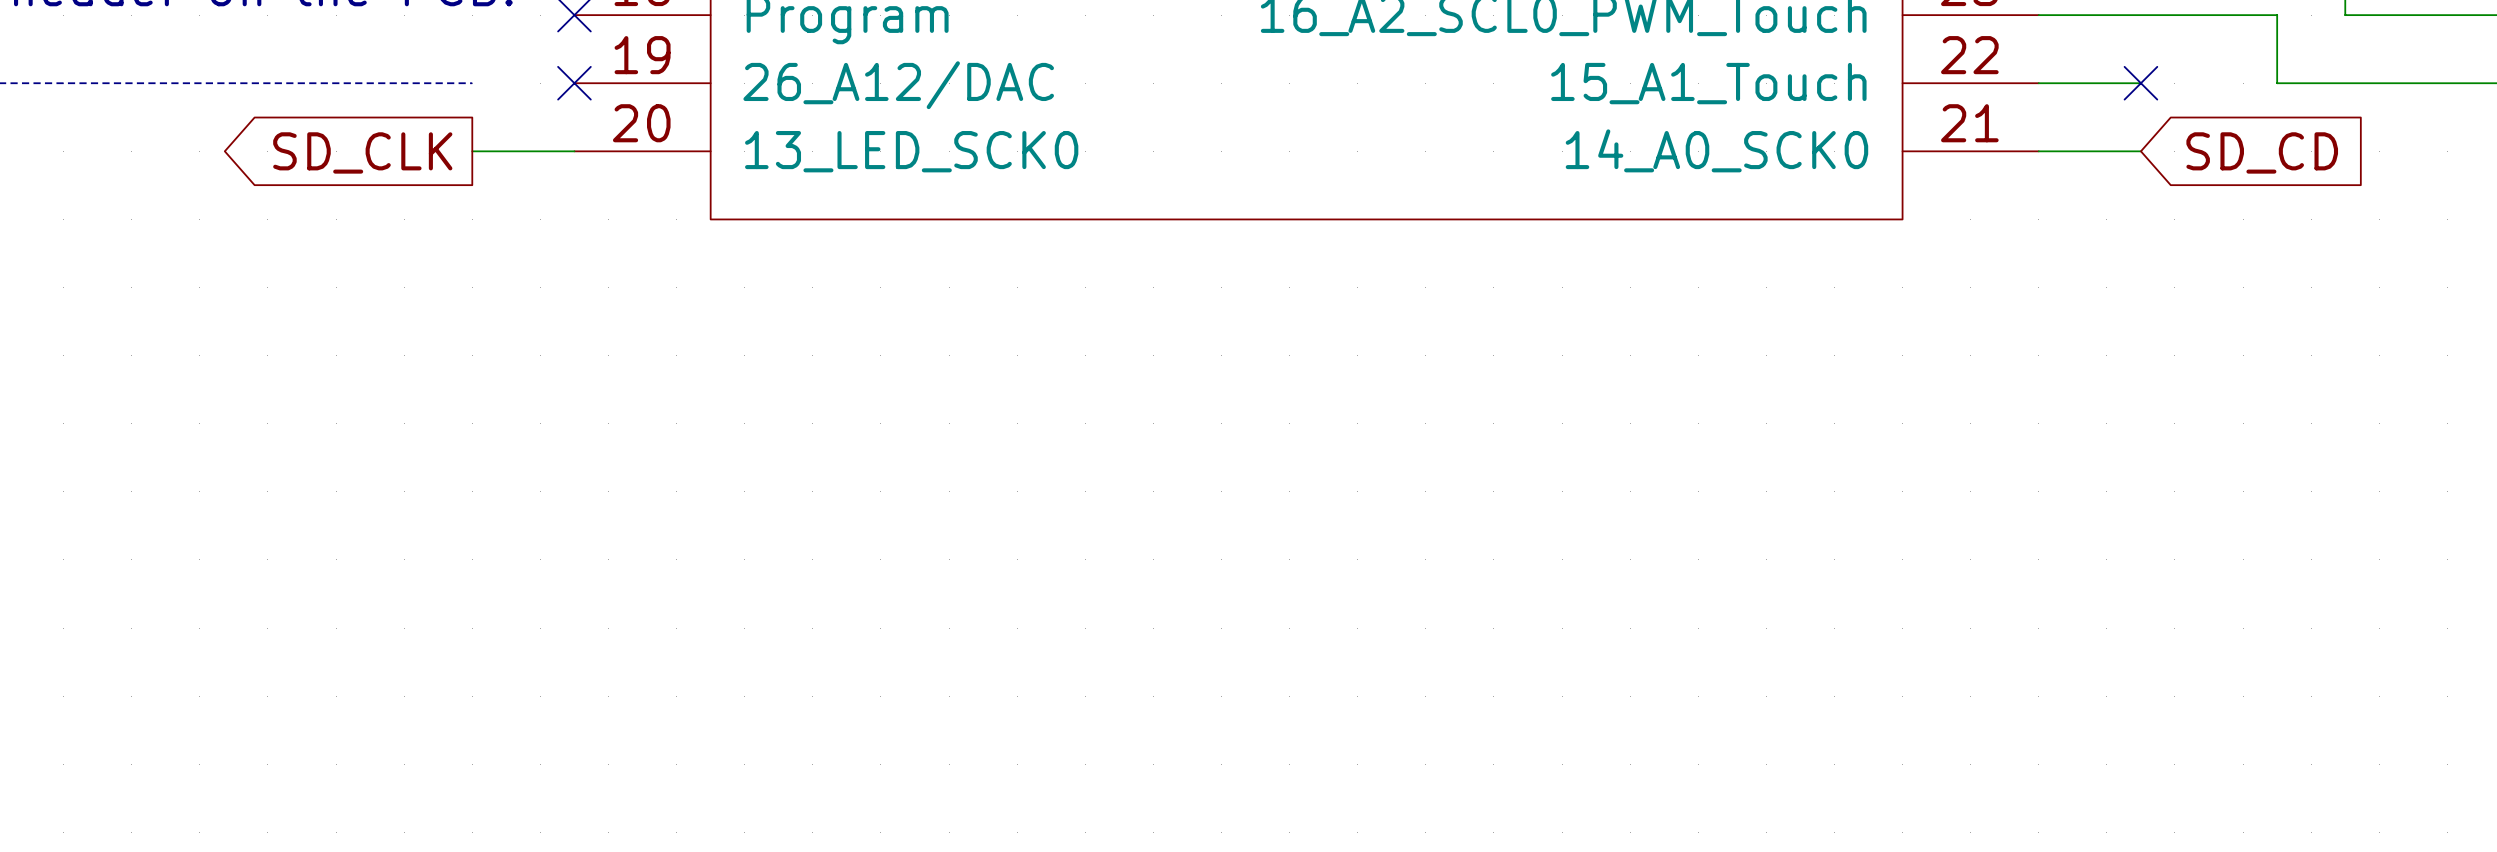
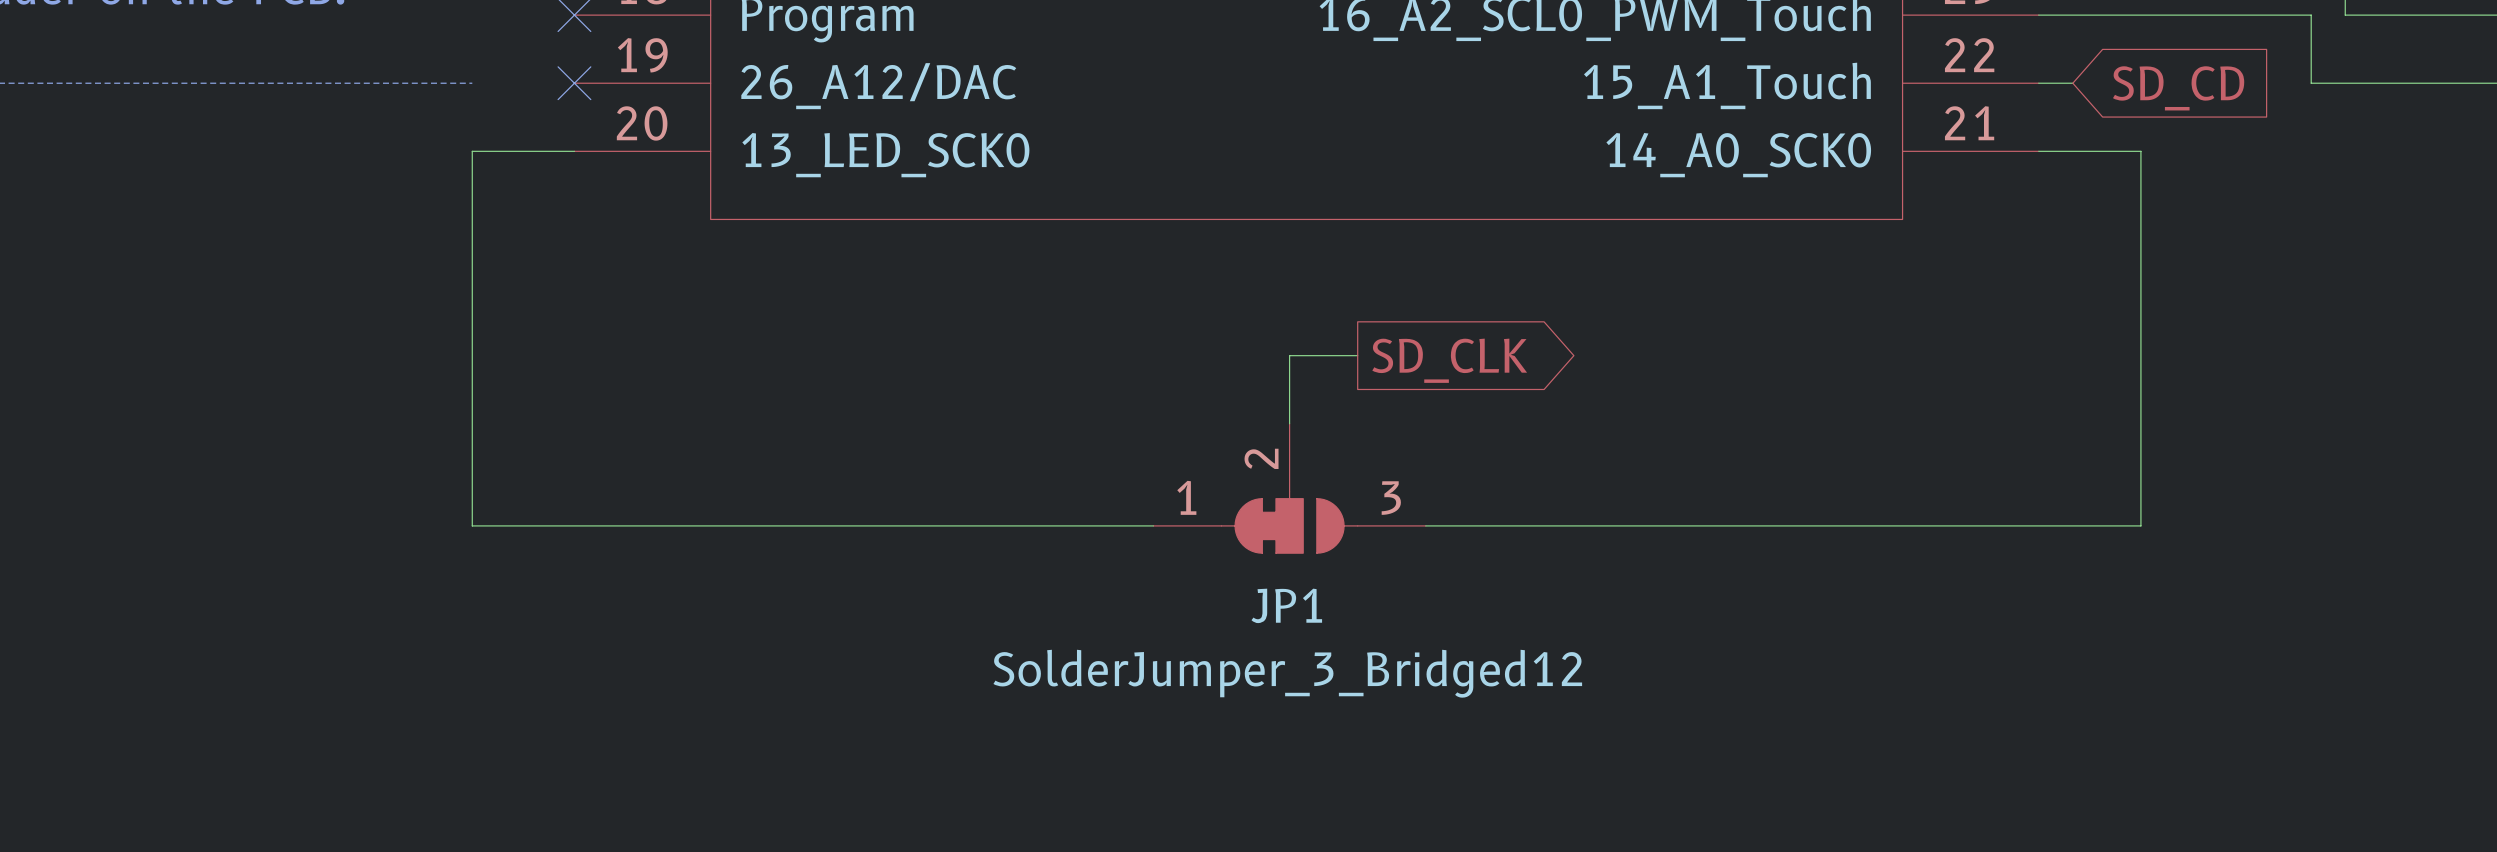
wire: (2277, 15) (2277, 83) (2311, 83) -> (2277, 15) (2311, 15) (2311, 83)
wire: (2072, 83) (2140, 83) -> none
no-connect mark: (2140, 83) -> none
wire: none -> (472, 151) (472, 525) (1153, 525)
wire: none -> (2140, 151) (2140, 525) (1425, 525)
global label: SD_CLK (362, 152) -> none
global label position: SD_CD (2262, 152) -> SD_CD (2178, 88)
wire: none -> (1357, 355) (1289, 355) (1289, 423)
global label: none -> SD_CLK (1449, 360)
JP1: none -> SolderJumper_3_Bridged12 (1289, 488)

